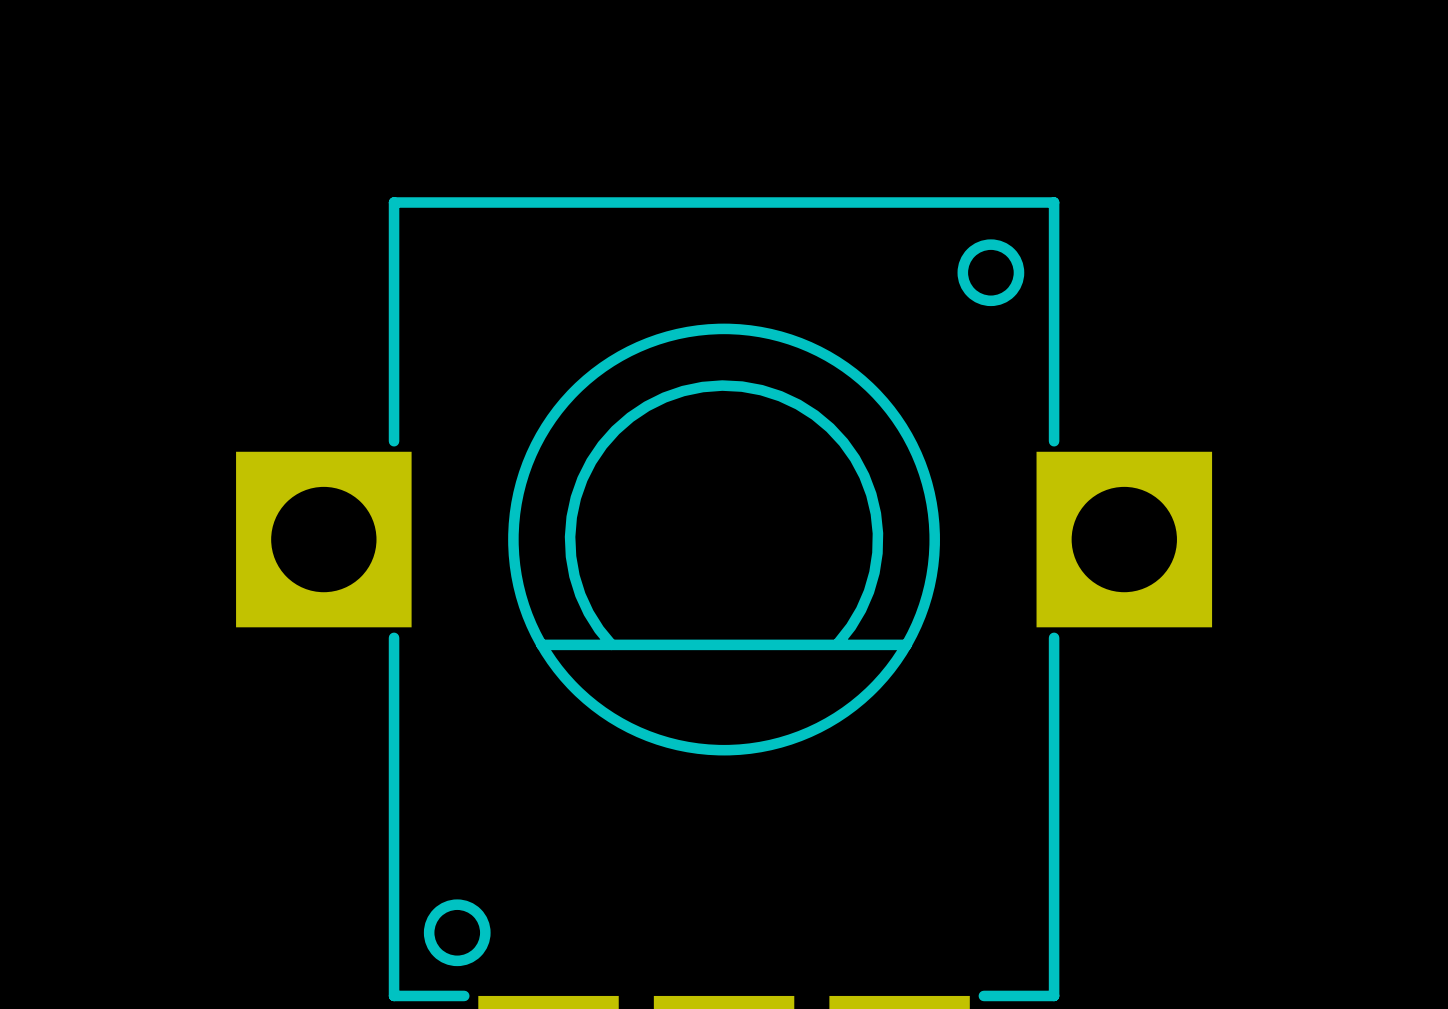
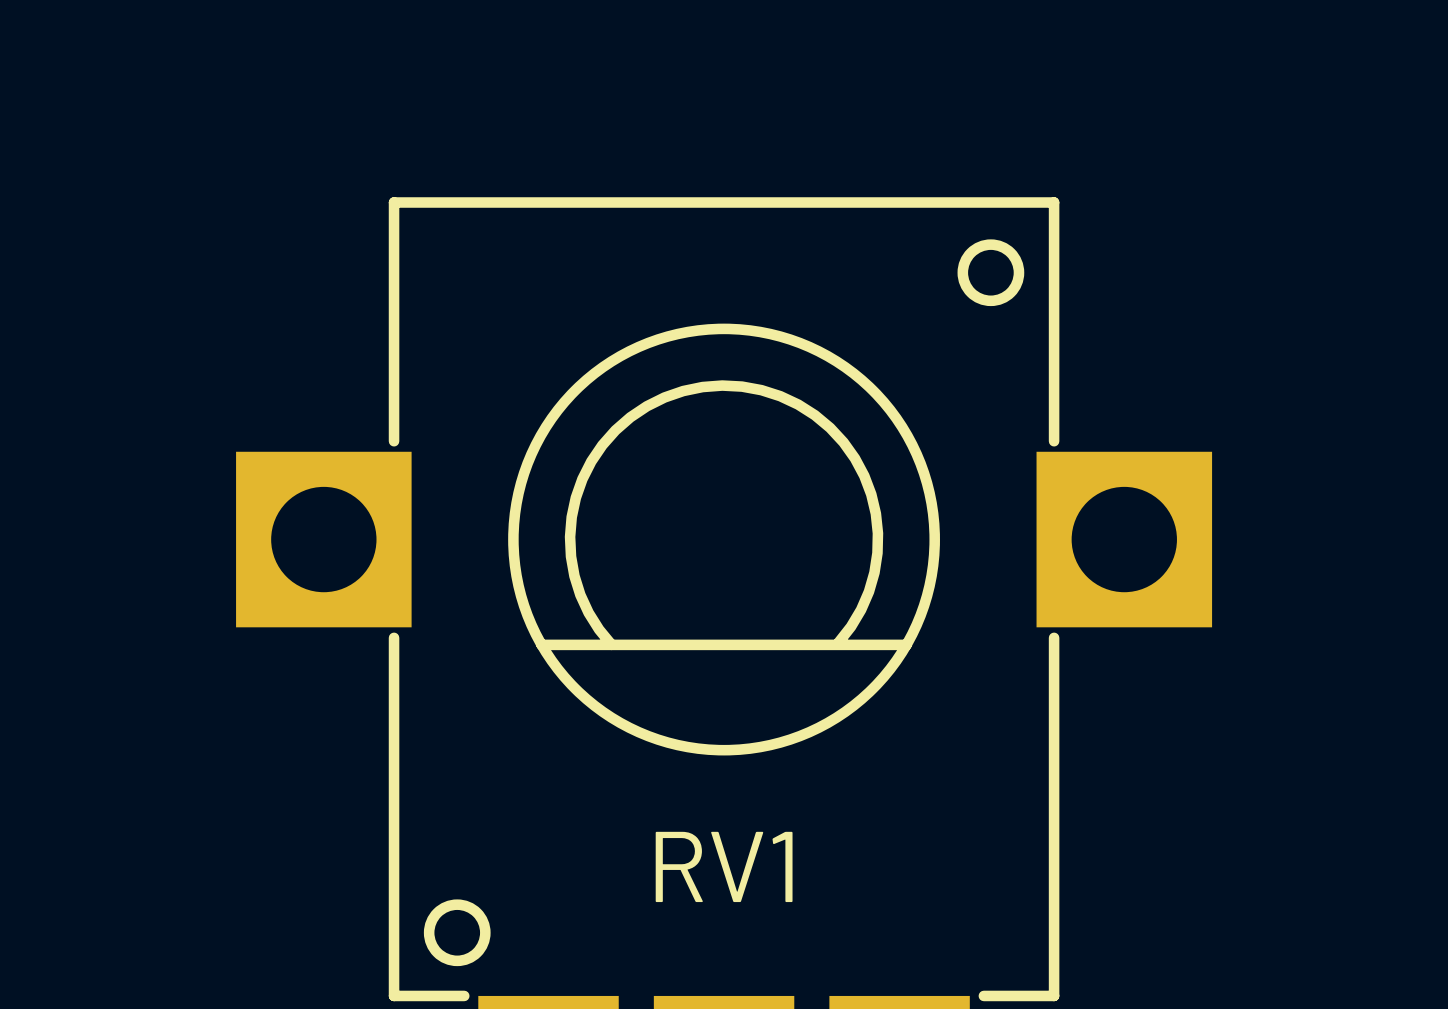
RV1 name: none -> RV1 (724, 866)

